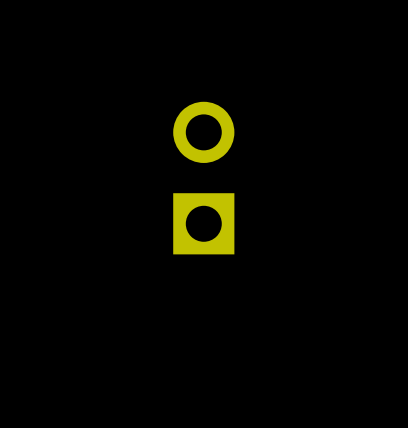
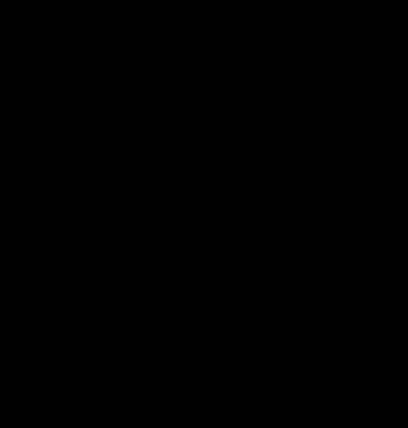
part: (203, 178) -> none

